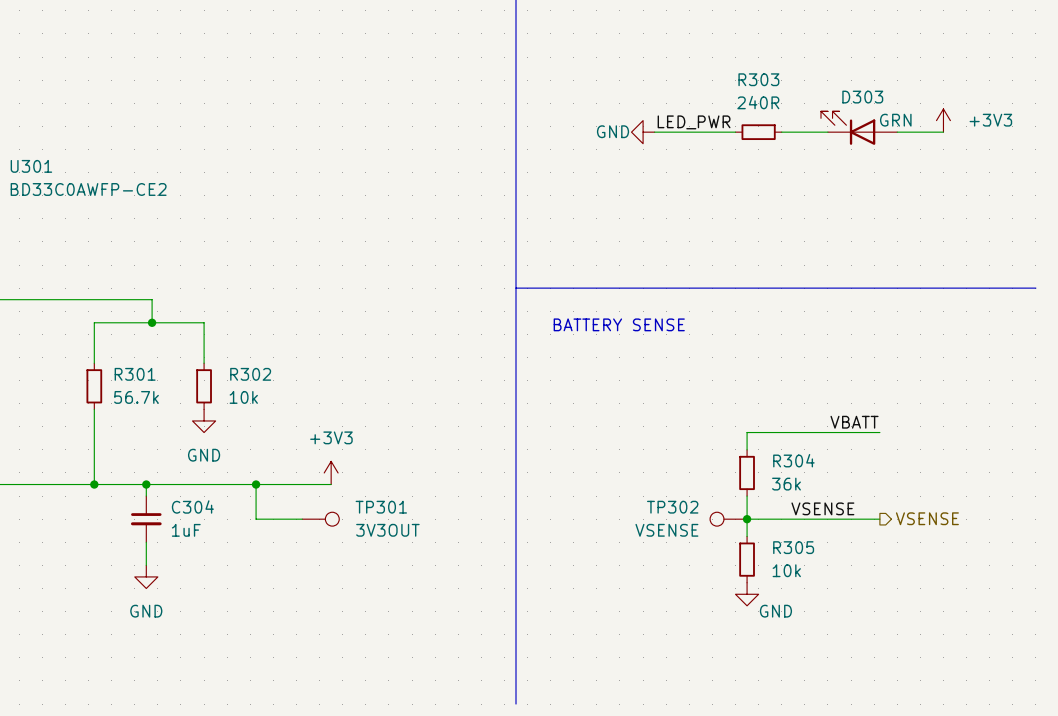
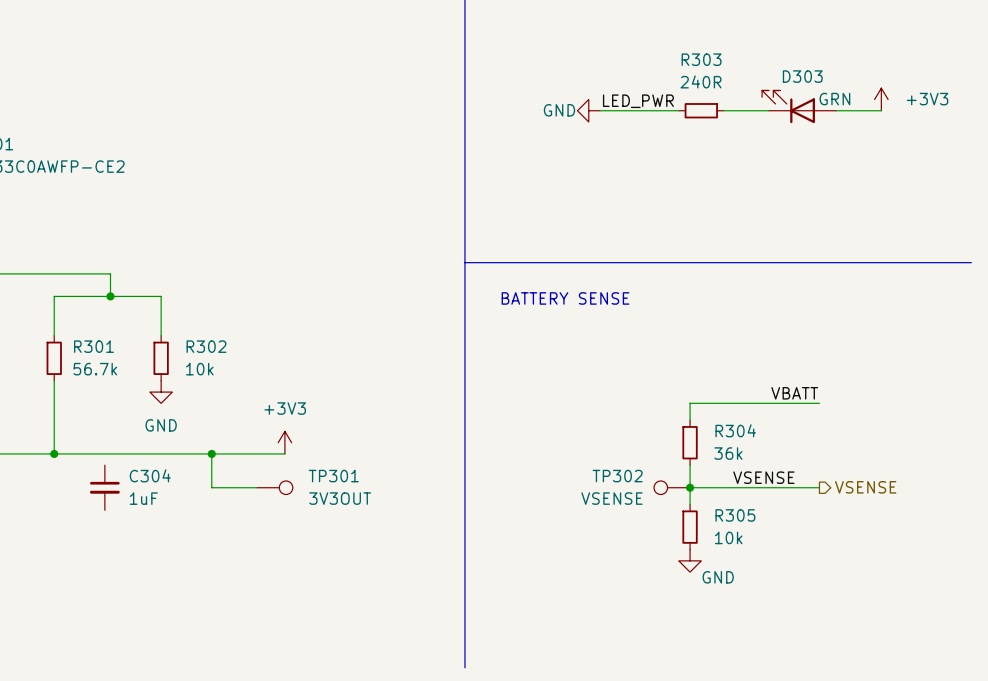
wire: (146, 484) (146, 496) -> none
junction: (146, 484) -> none
wire: (146, 542) (146, 565) -> none
power symbol: GND (146, 576) -> none

